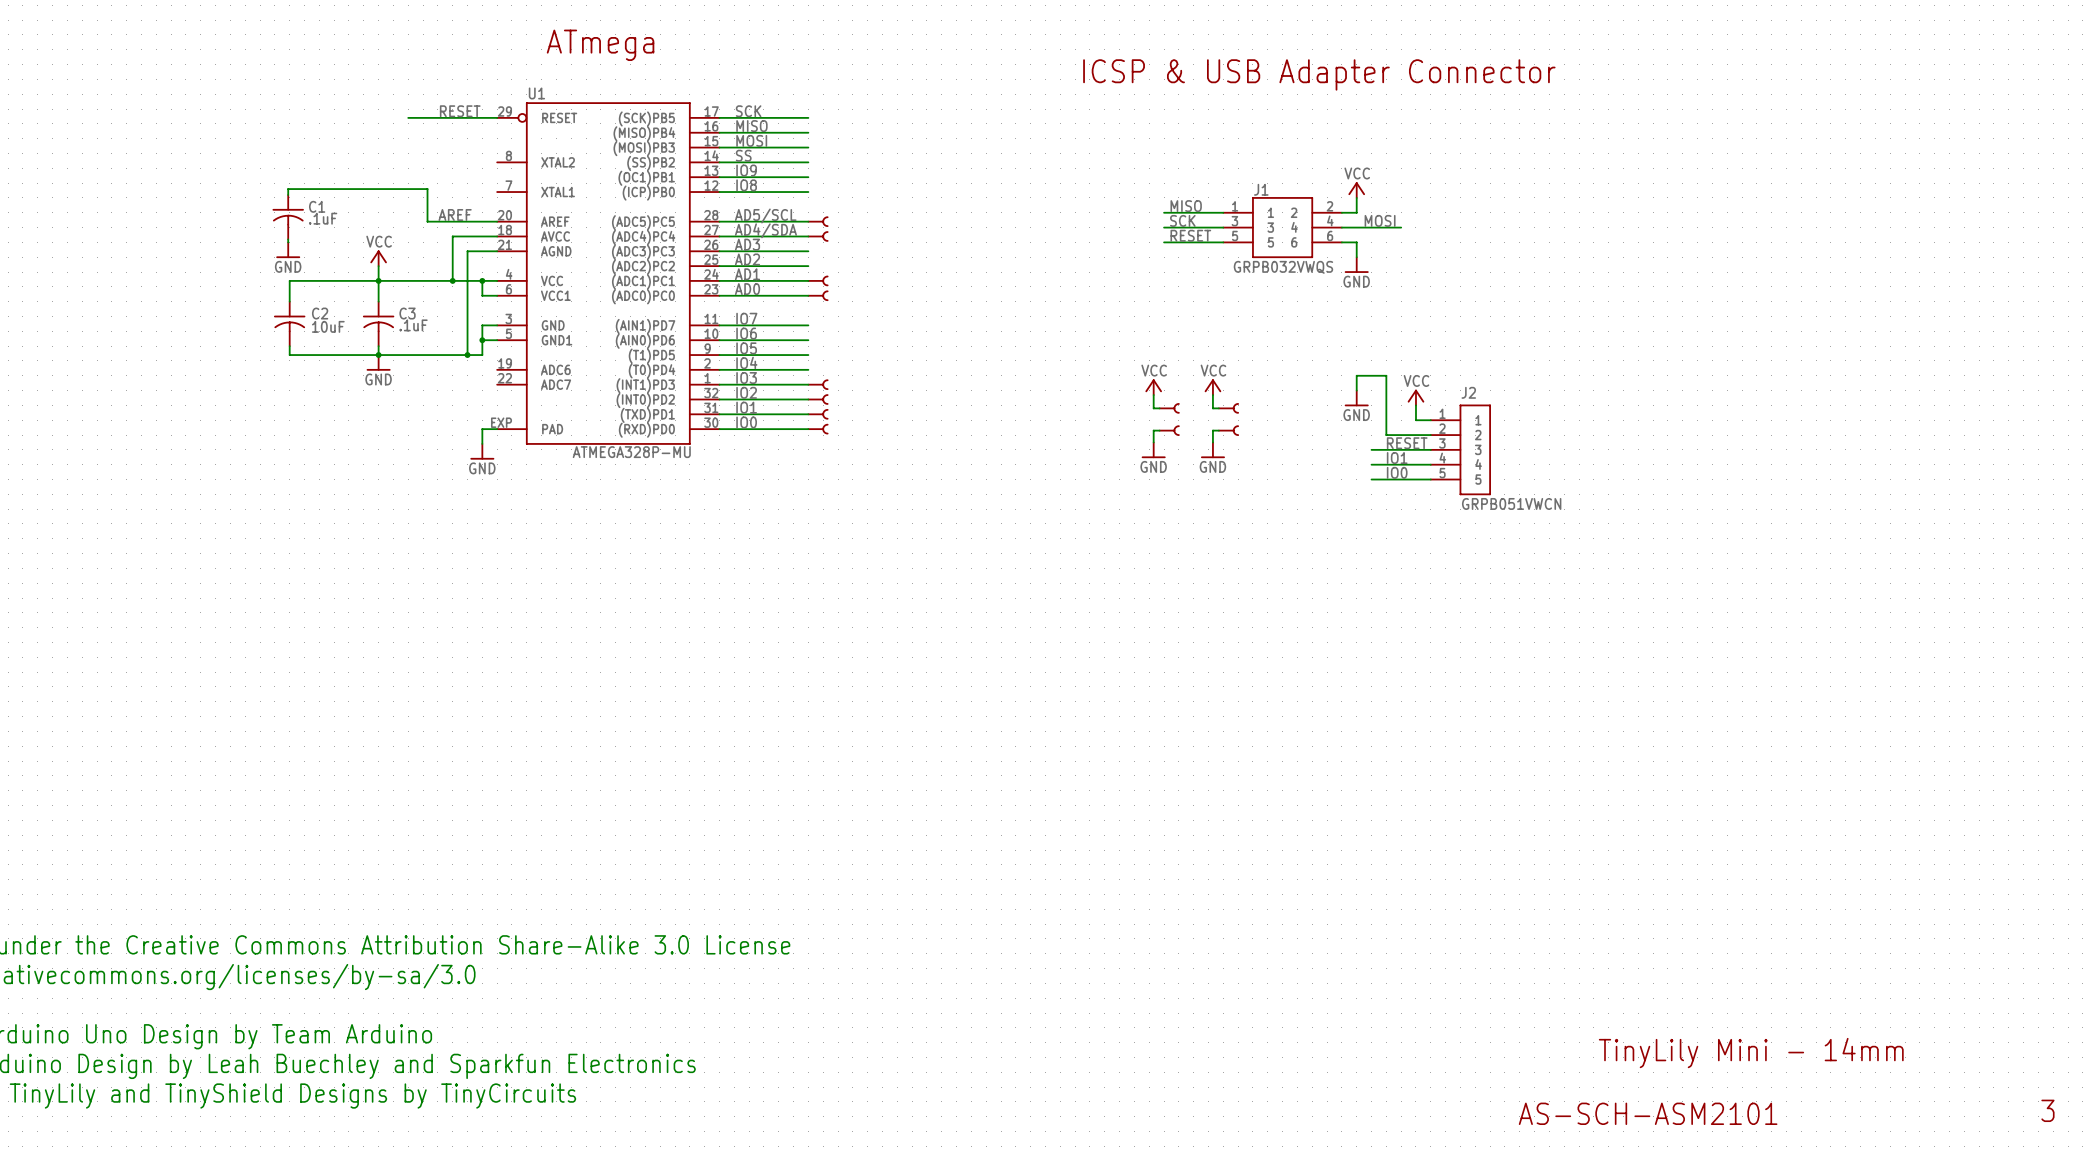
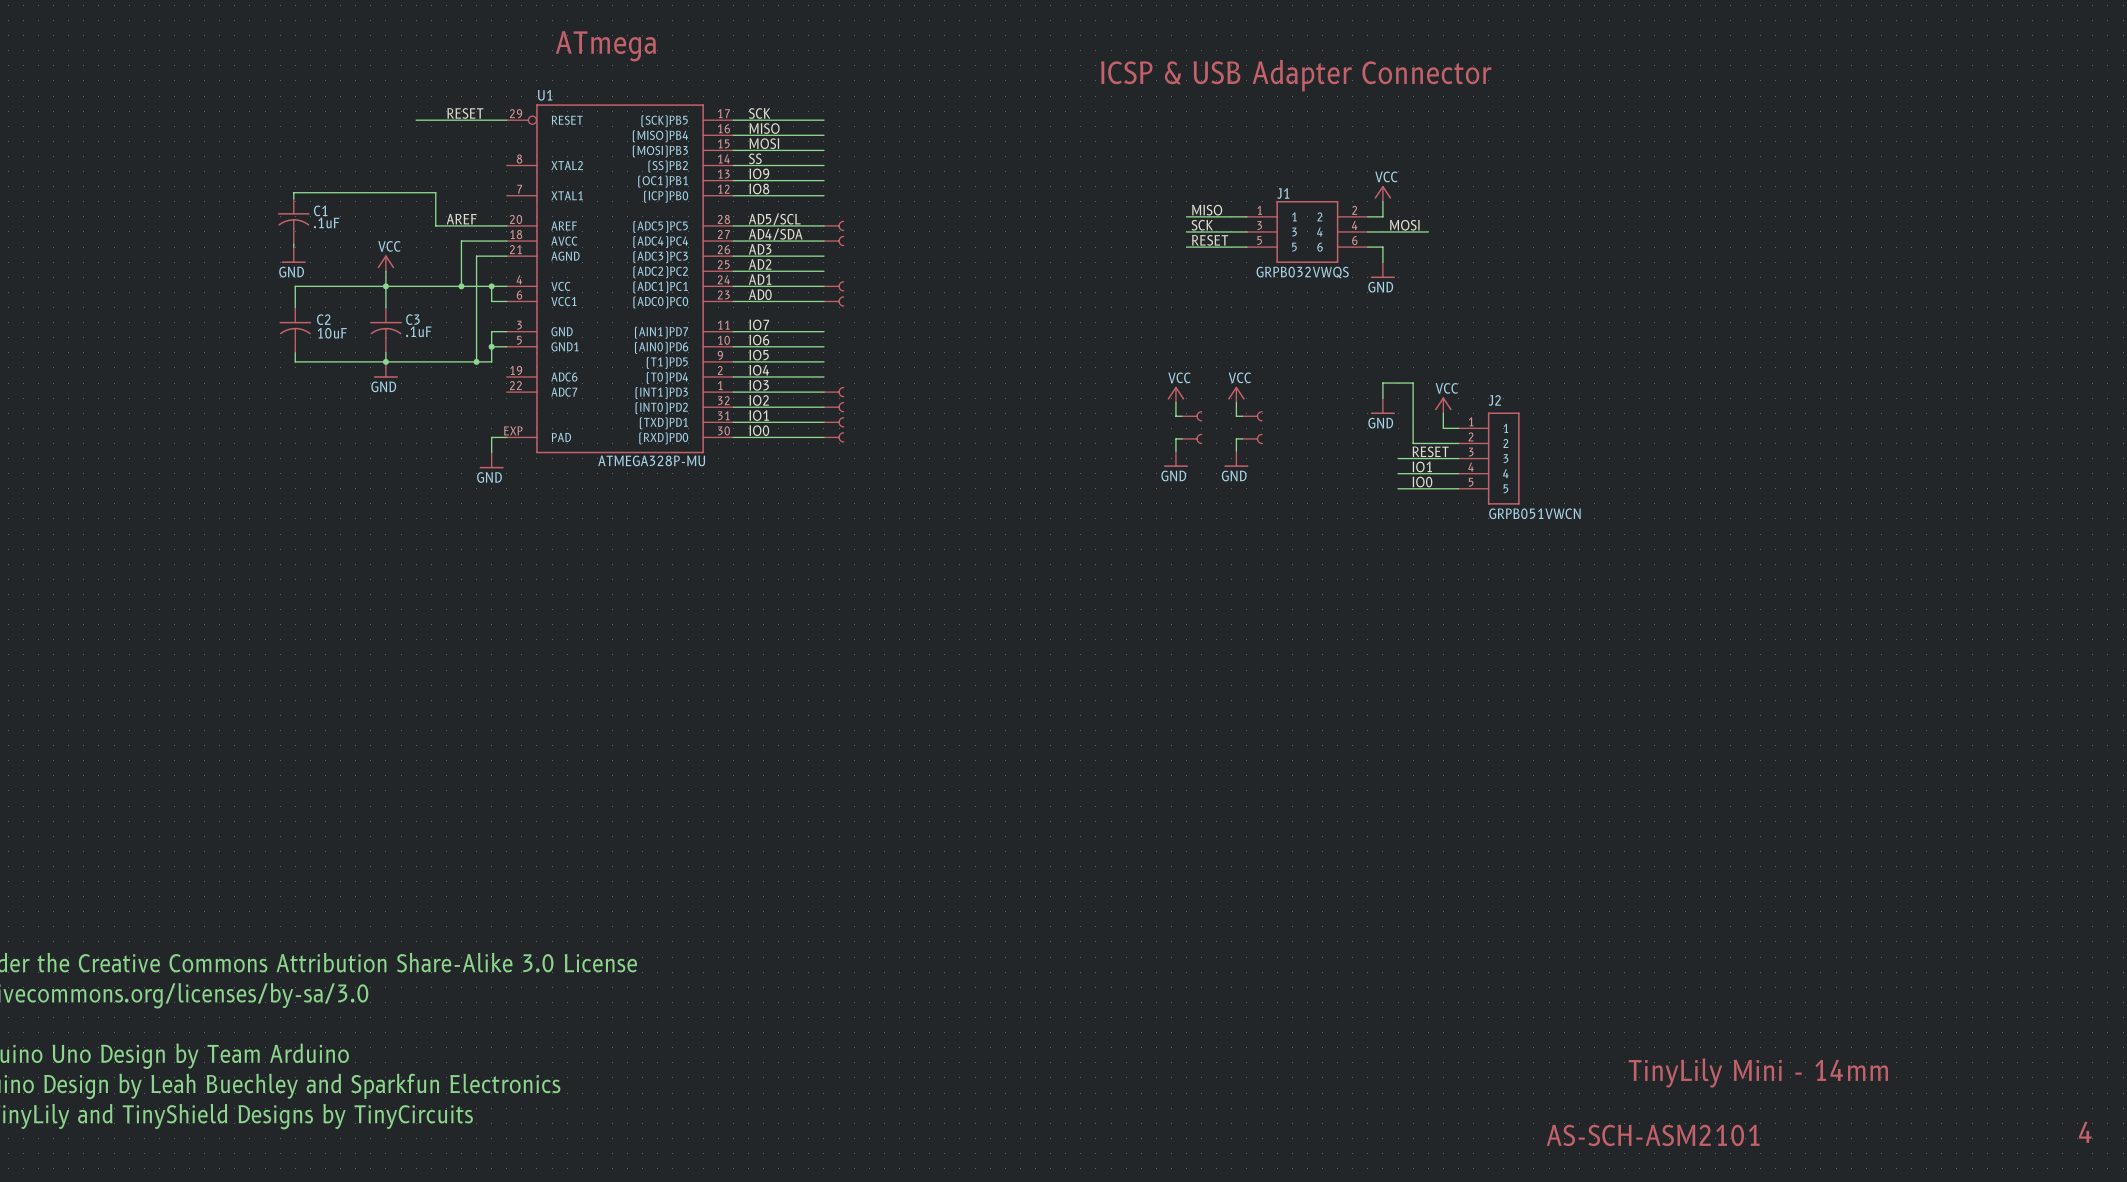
text: 3 (2047, 1110) -> 4 (2085, 1132)

